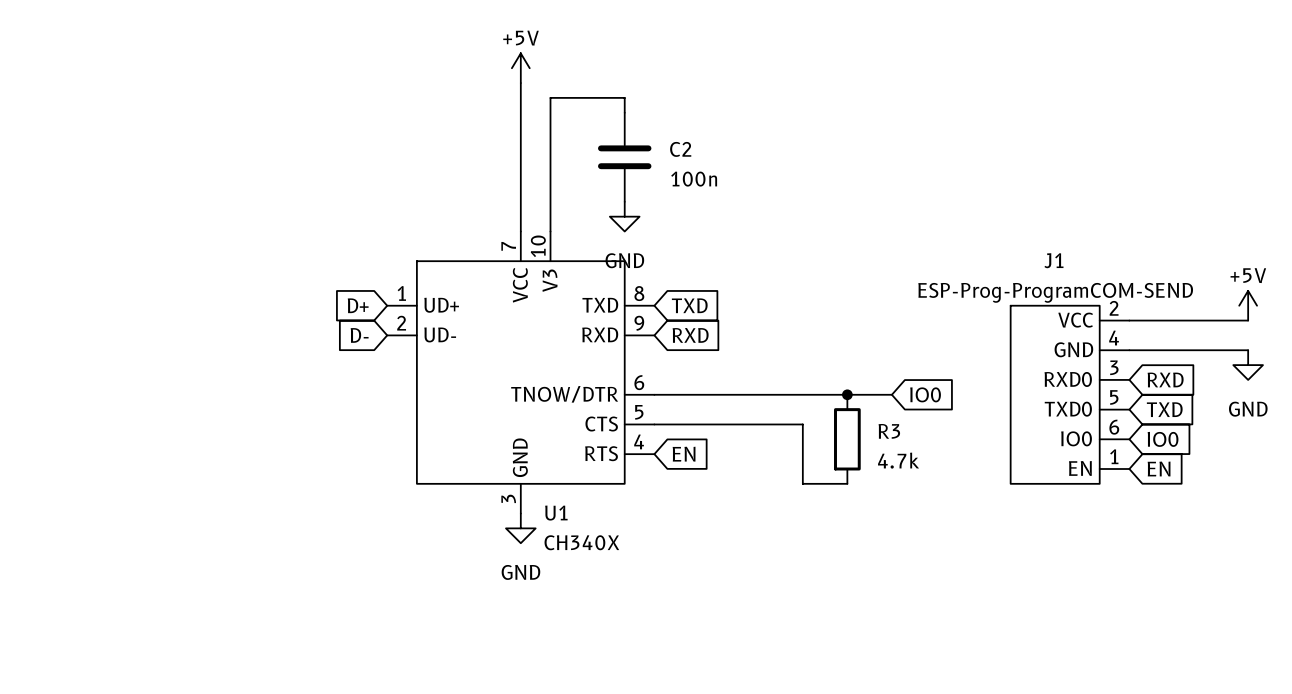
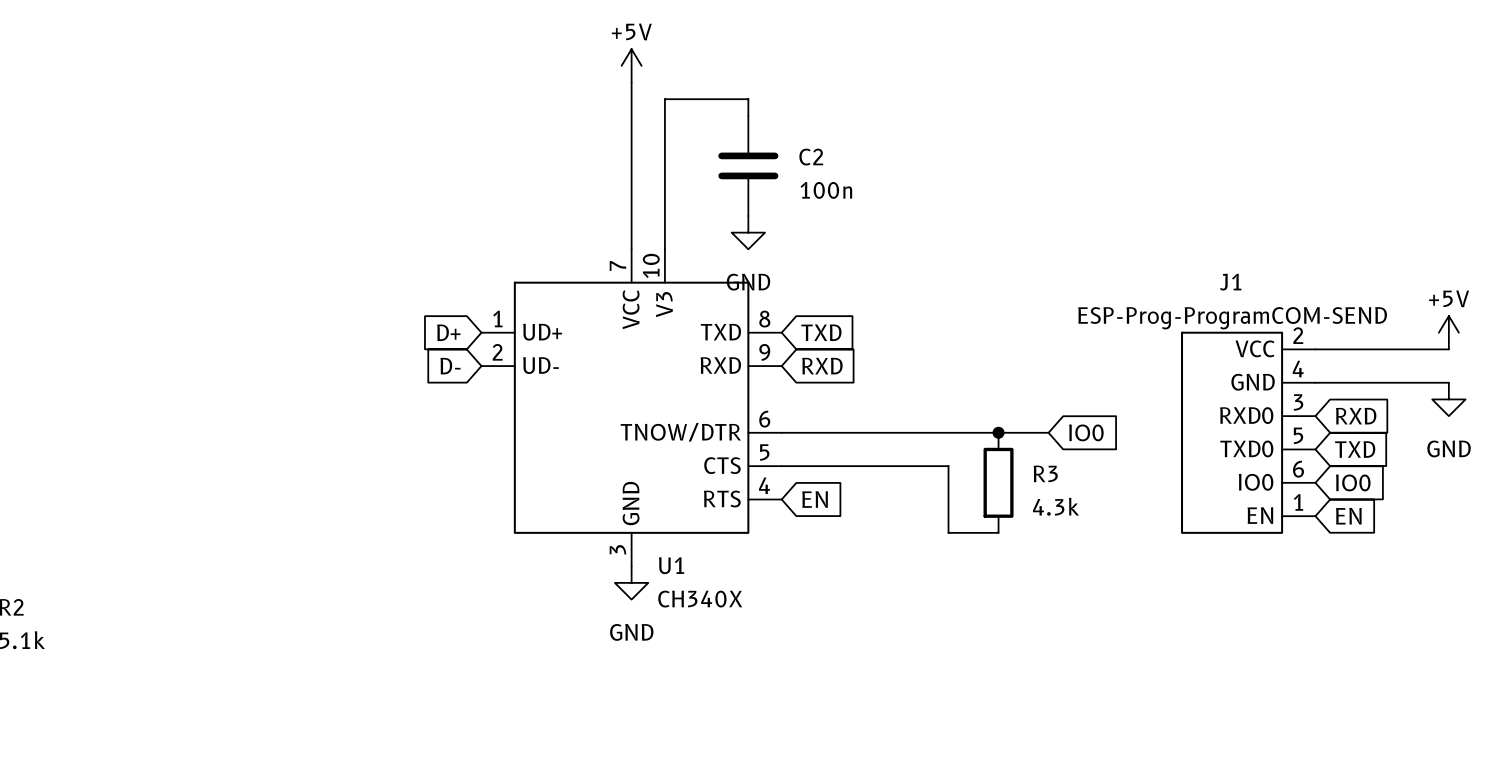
R3 value: 4.7k (898, 460) -> 4.3k (1056, 506)

